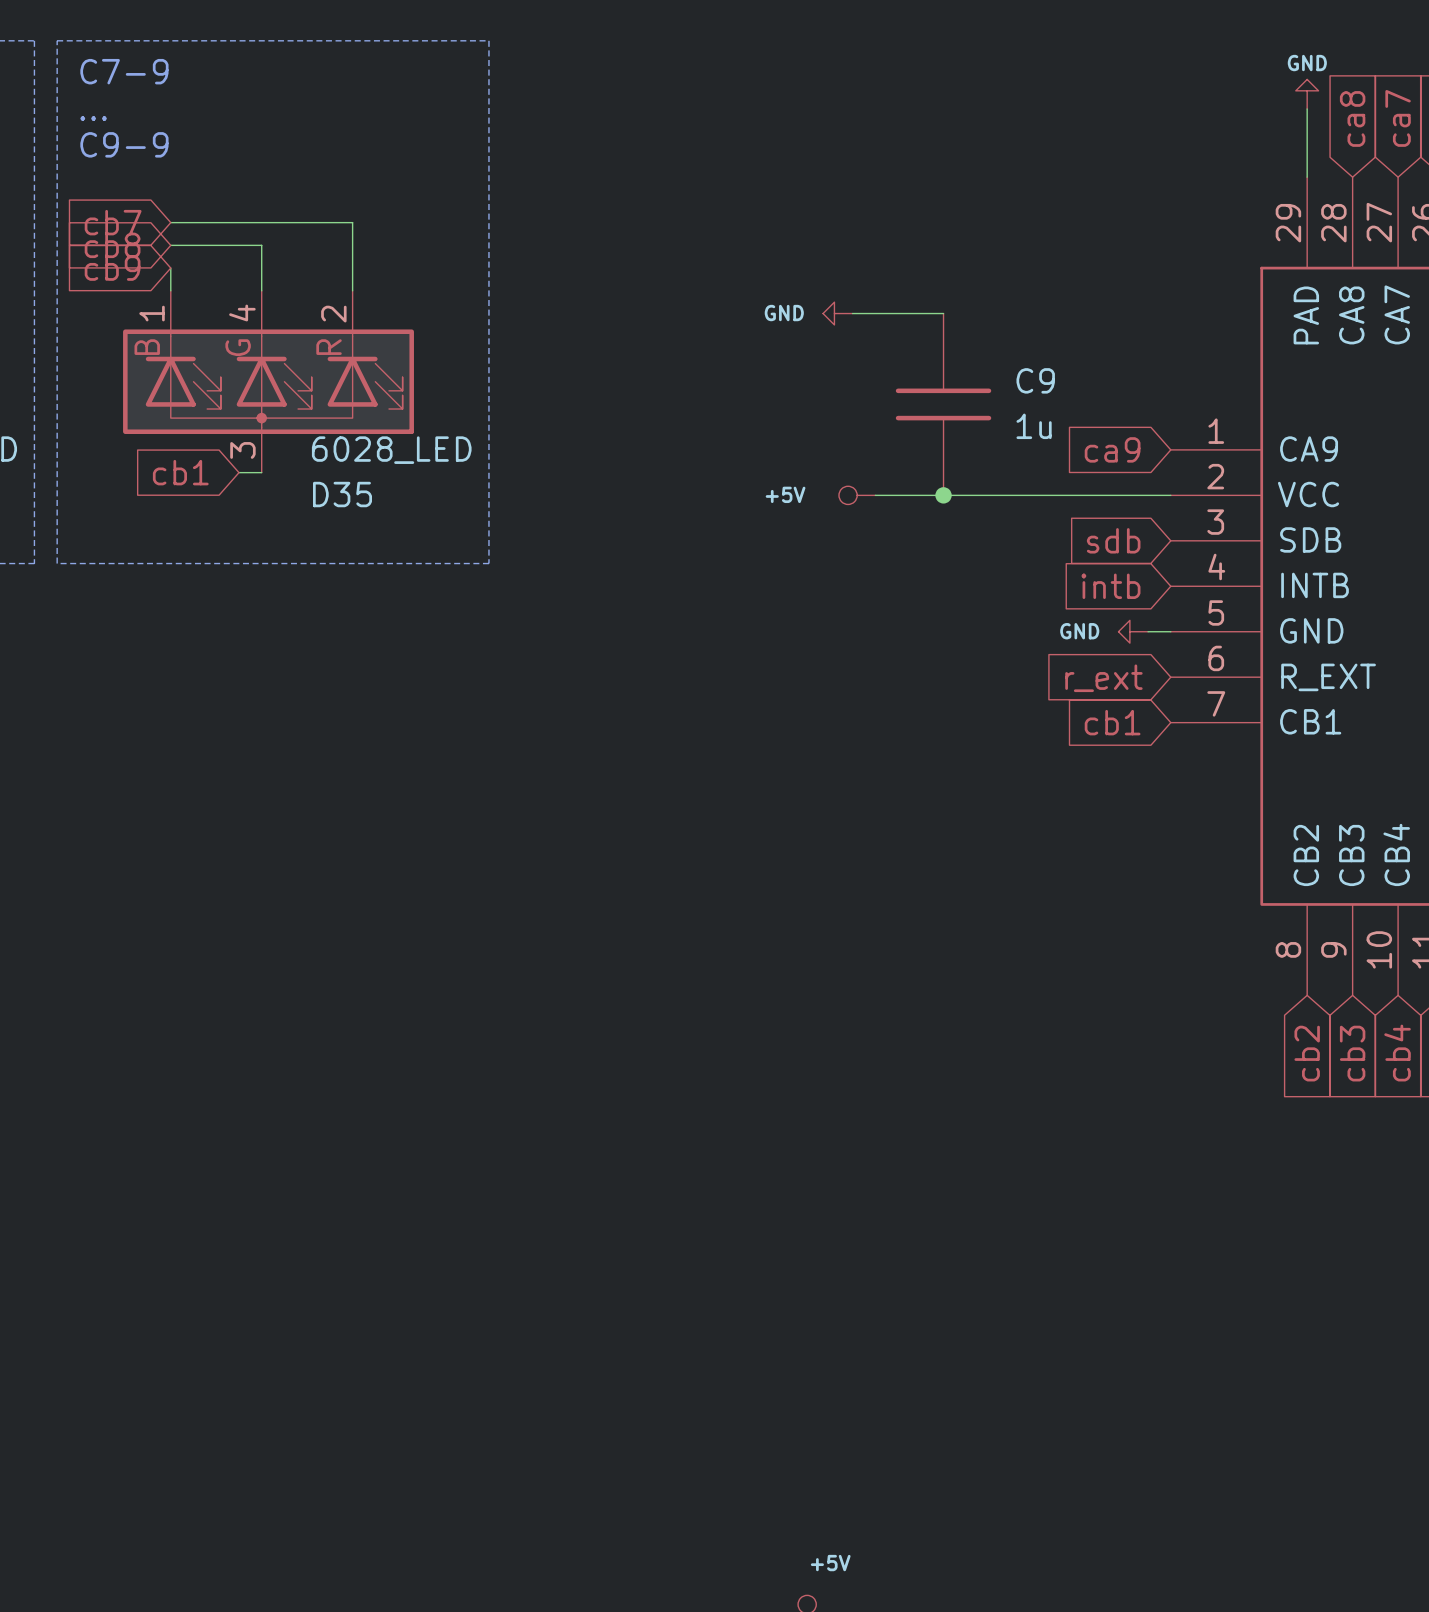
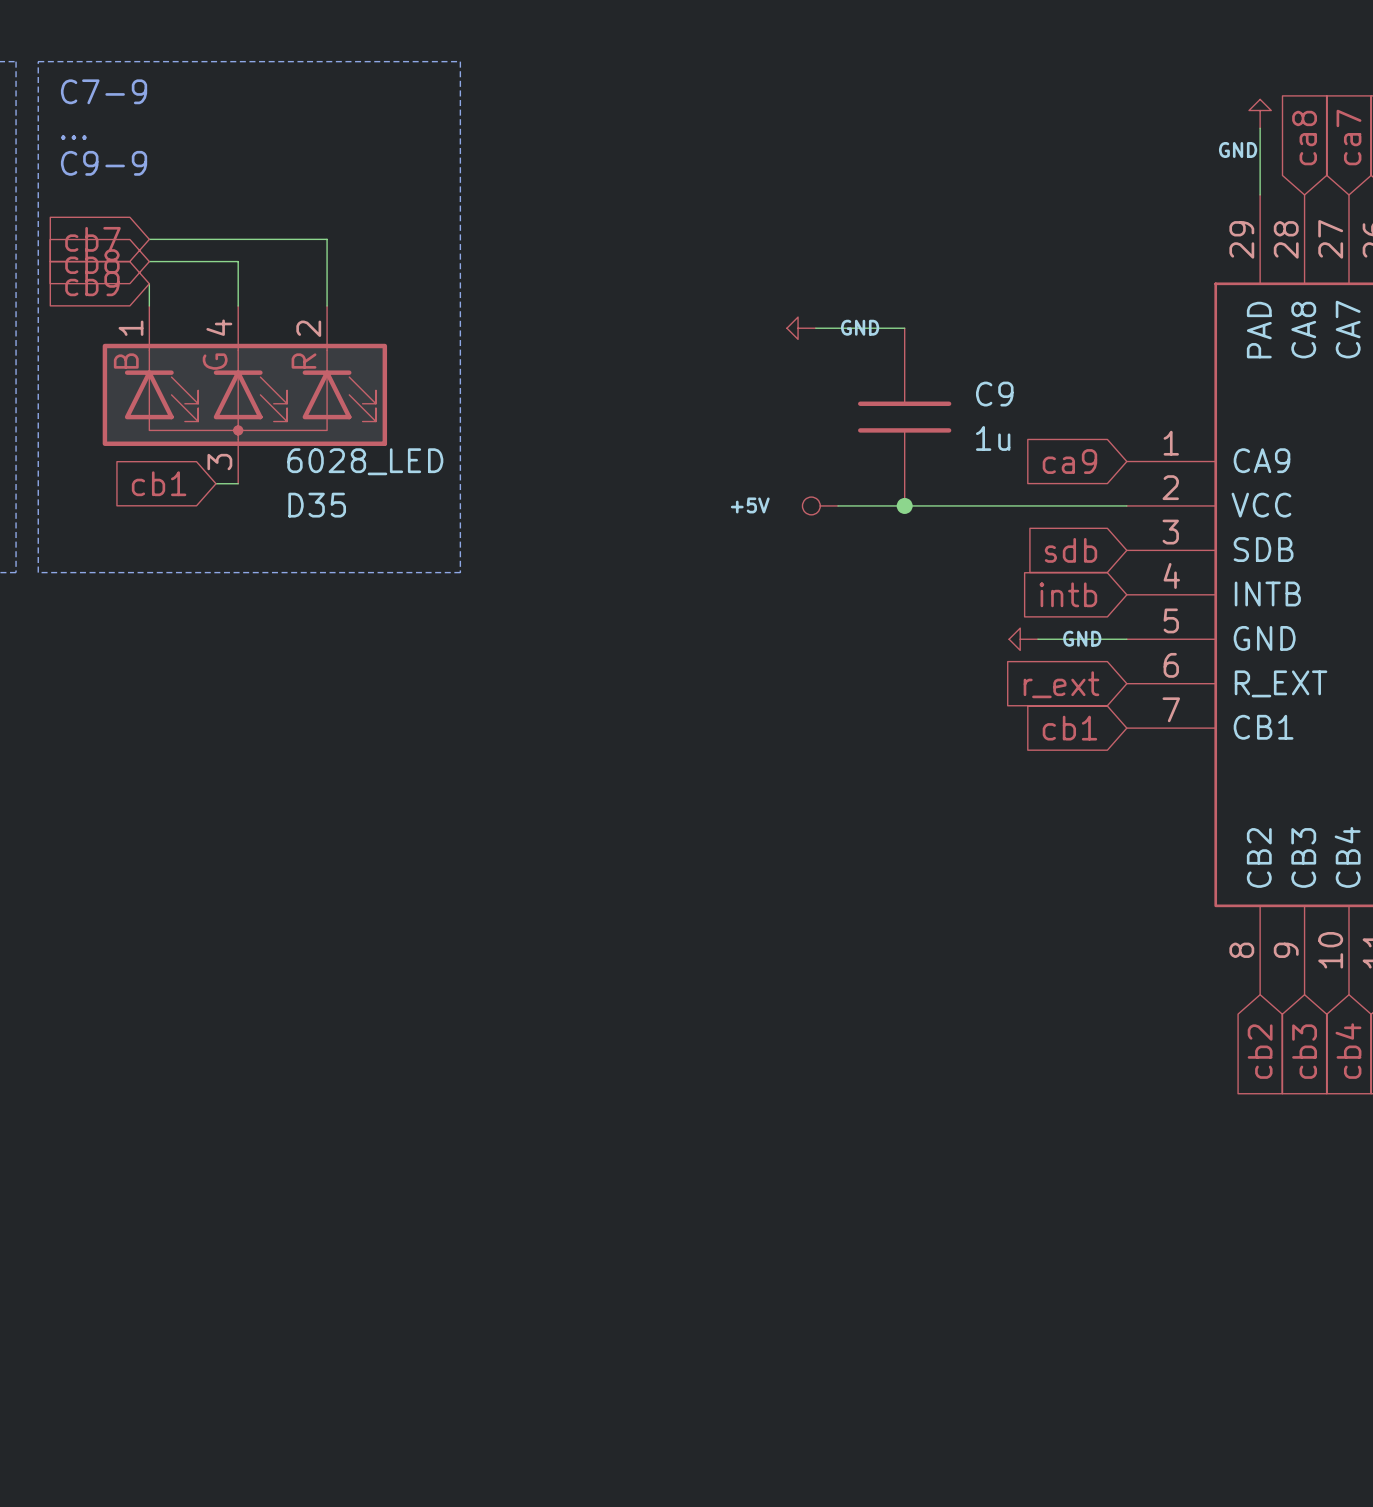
power symbol text position: GND (1307, 63) -> GND (1238, 150)
power symbol text position: GND (784, 313) -> GND (860, 327)
wire: none -> (1037, 639) (1104, 639)
power symbol text position: GND (1079, 631) -> GND (1082, 638)
power symbol position: GND (1133, 631) -> GND (1023, 639)

